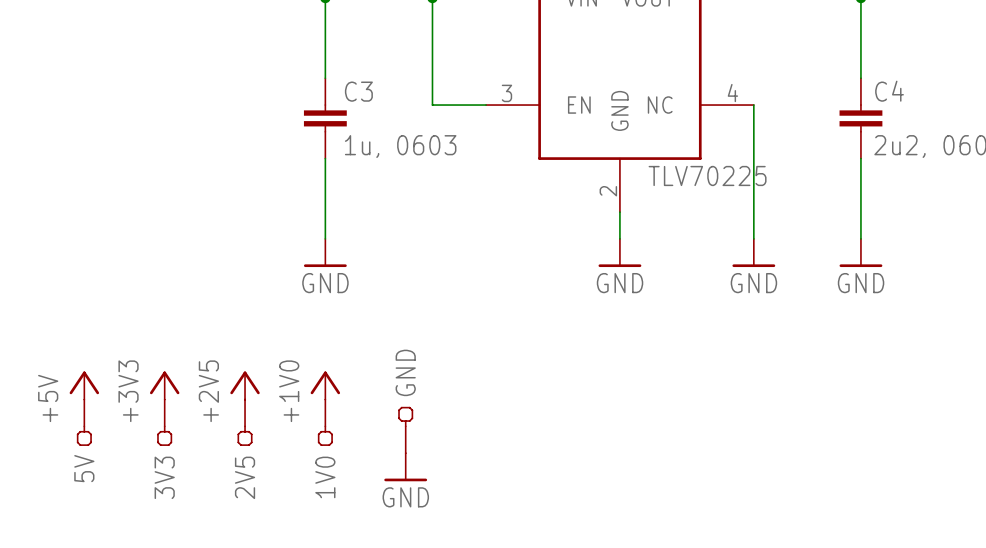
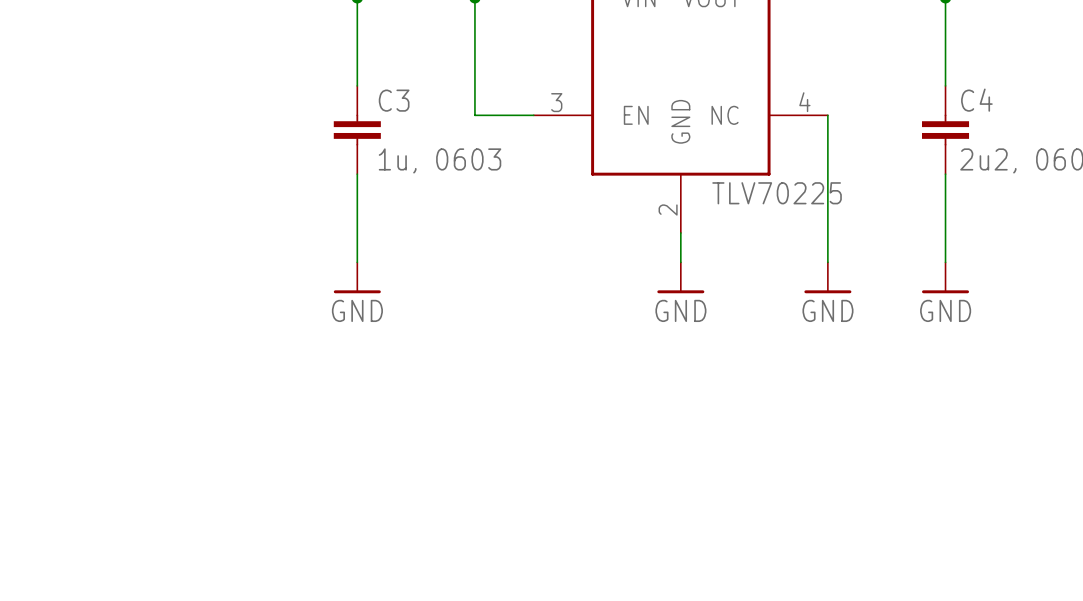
power symbol: +5V (84, 385) -> none
power symbol: +3V3 (164, 385) -> none
power symbol: +2V5 (245, 385) -> none
power symbol: +1V0 (325, 385) -> none
5V: (84, 422) -> none
3V3: (164, 422) -> none
2V5: (245, 422) -> none
1V0: (325, 422) -> none
GND: (405, 429) -> none
power symbol: GND (405, 467) -> none

